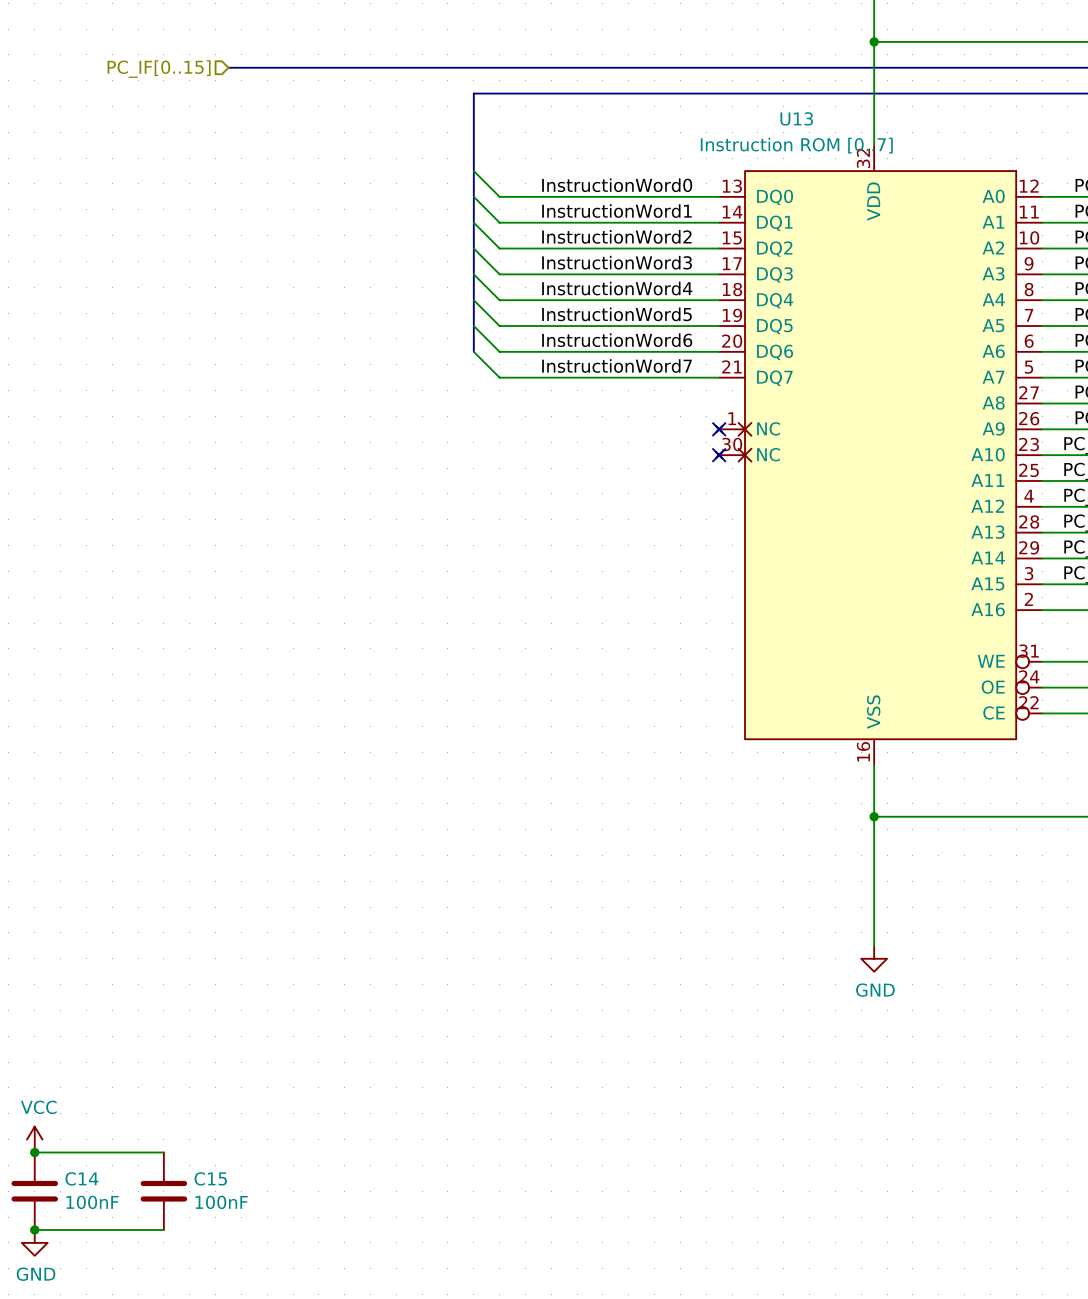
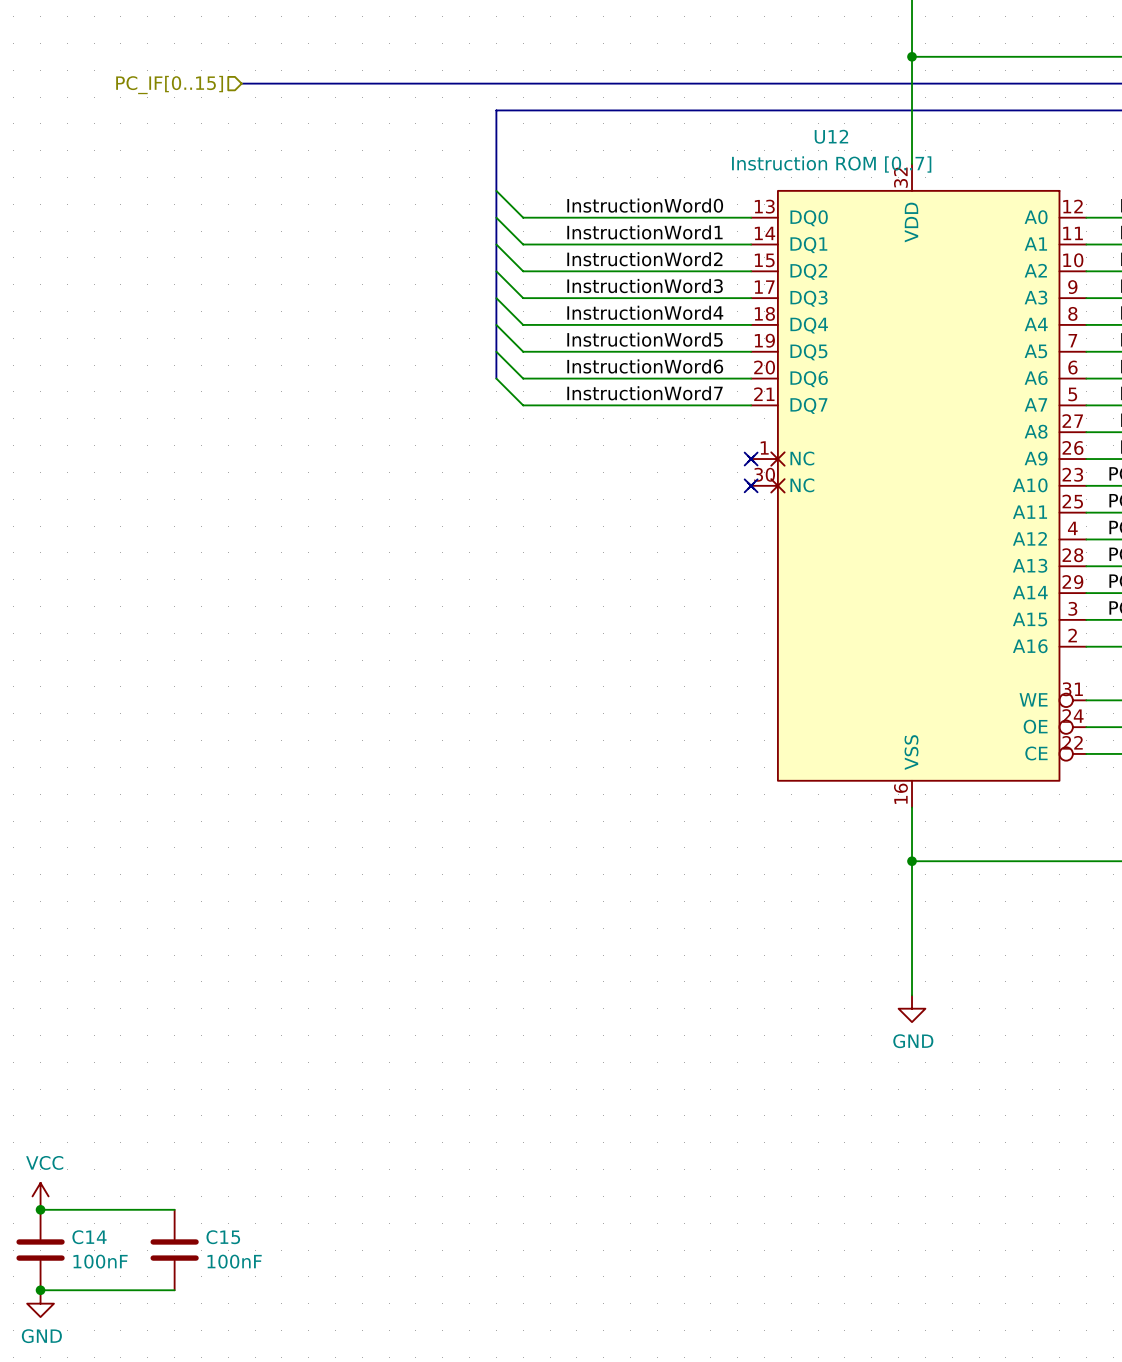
U13 name: U13 (796, 118) -> U12 (831, 136)

